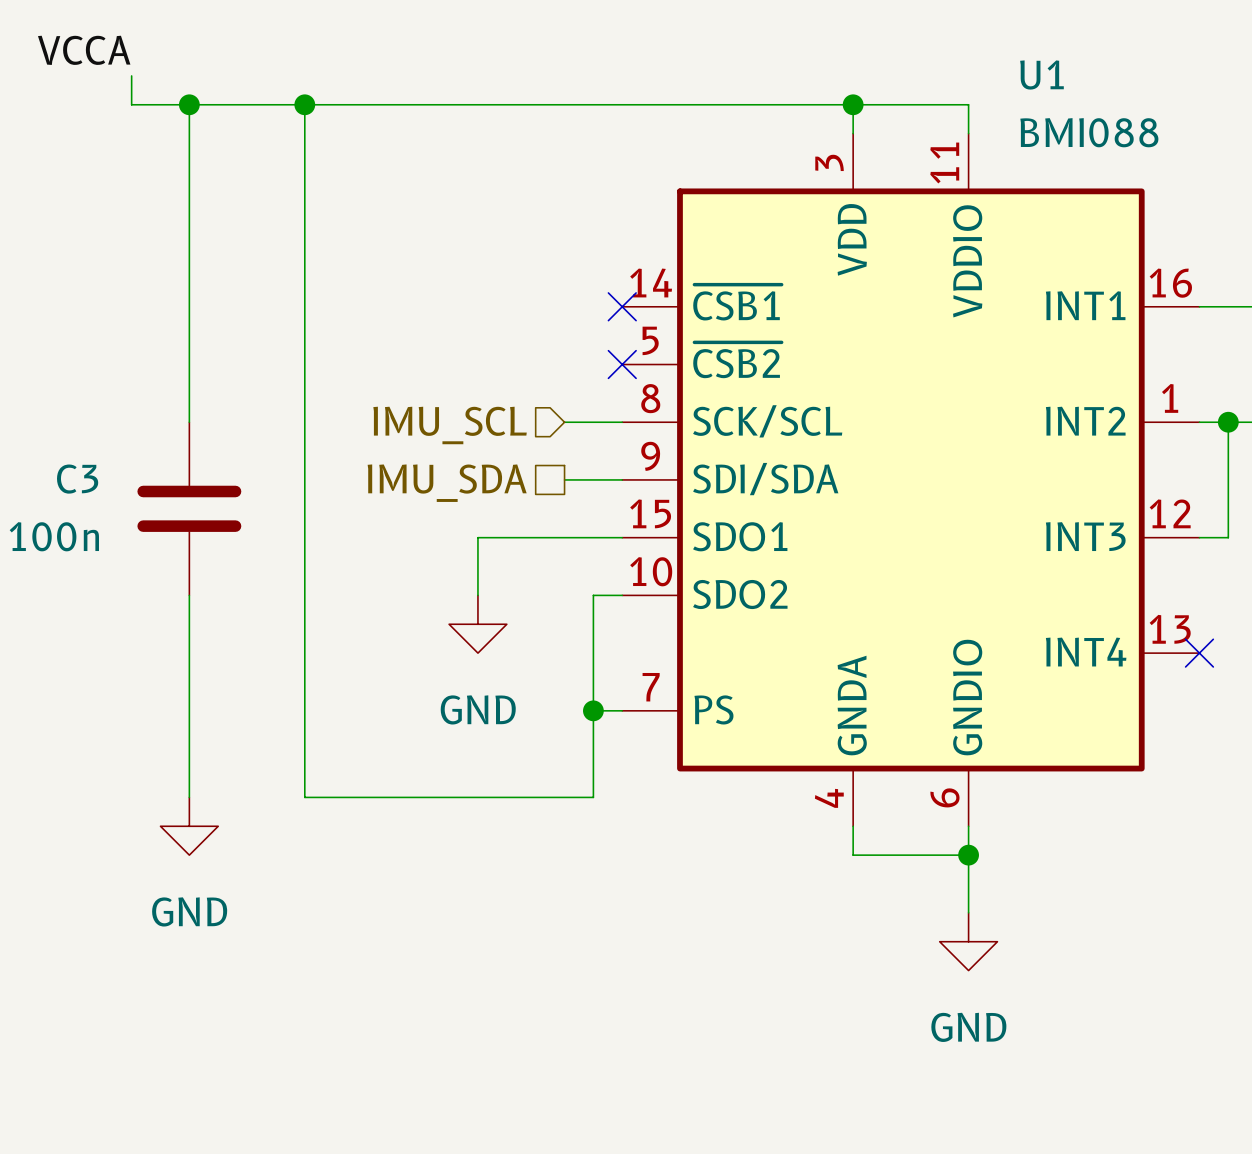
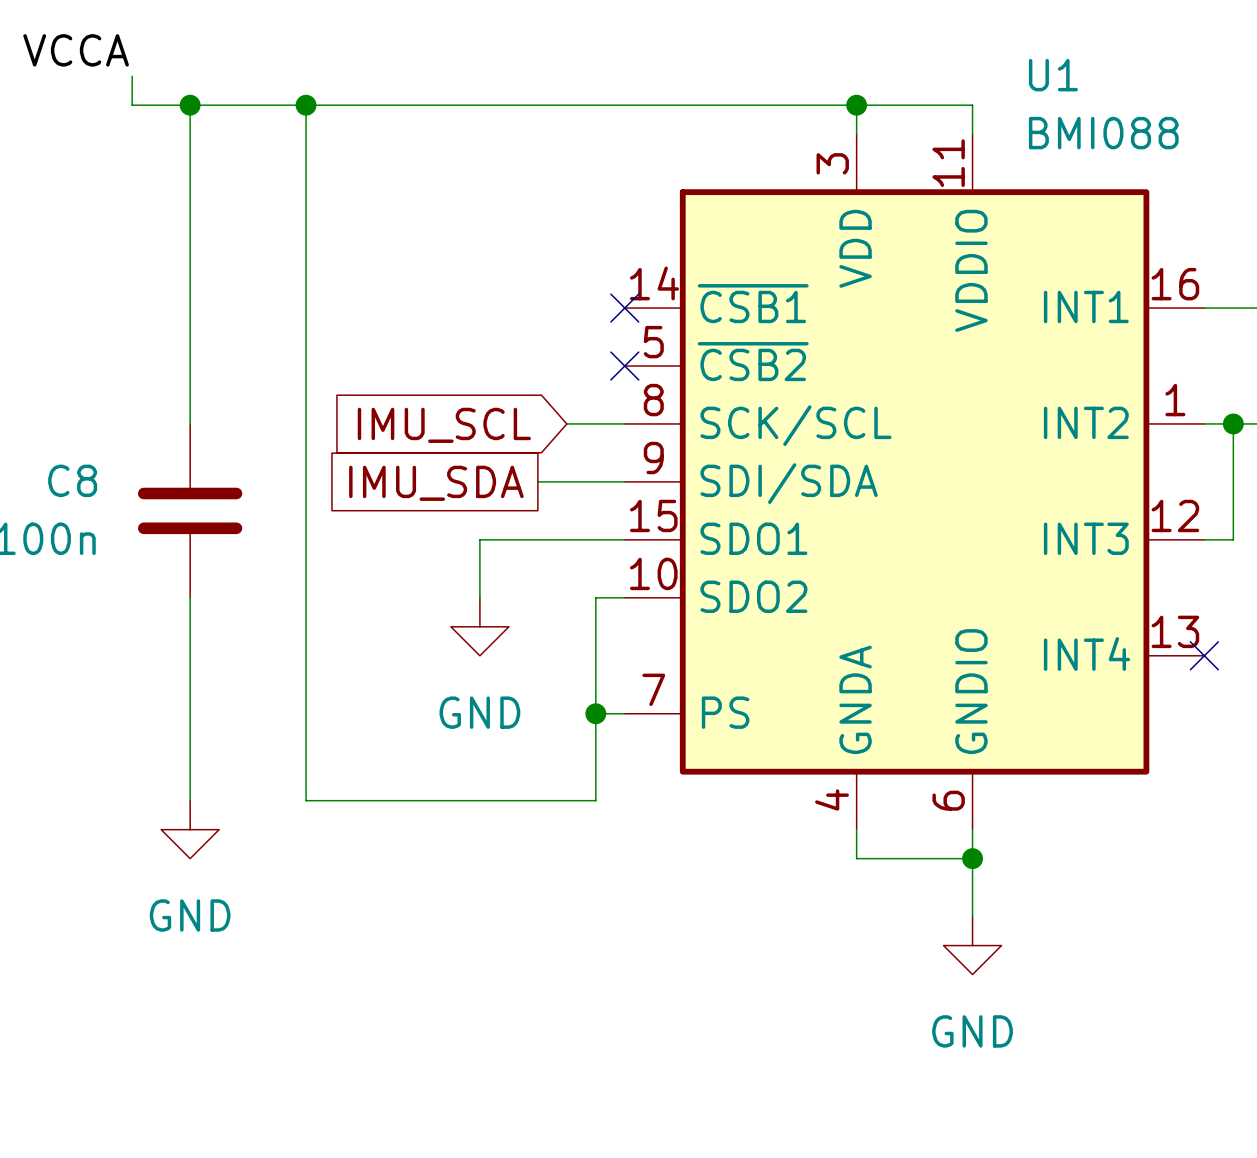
hierarchical label: IMU_SCL (450, 425) -> none
global label: none -> IMU_SCL (444, 425)
C3 name: C3 (77, 479) -> C8 (72, 480)
wire: none -> (537, 481) (566, 481)
hierarchical label: IMU_SDA (447, 483) -> none
global label: none -> IMU_SDA (436, 483)

